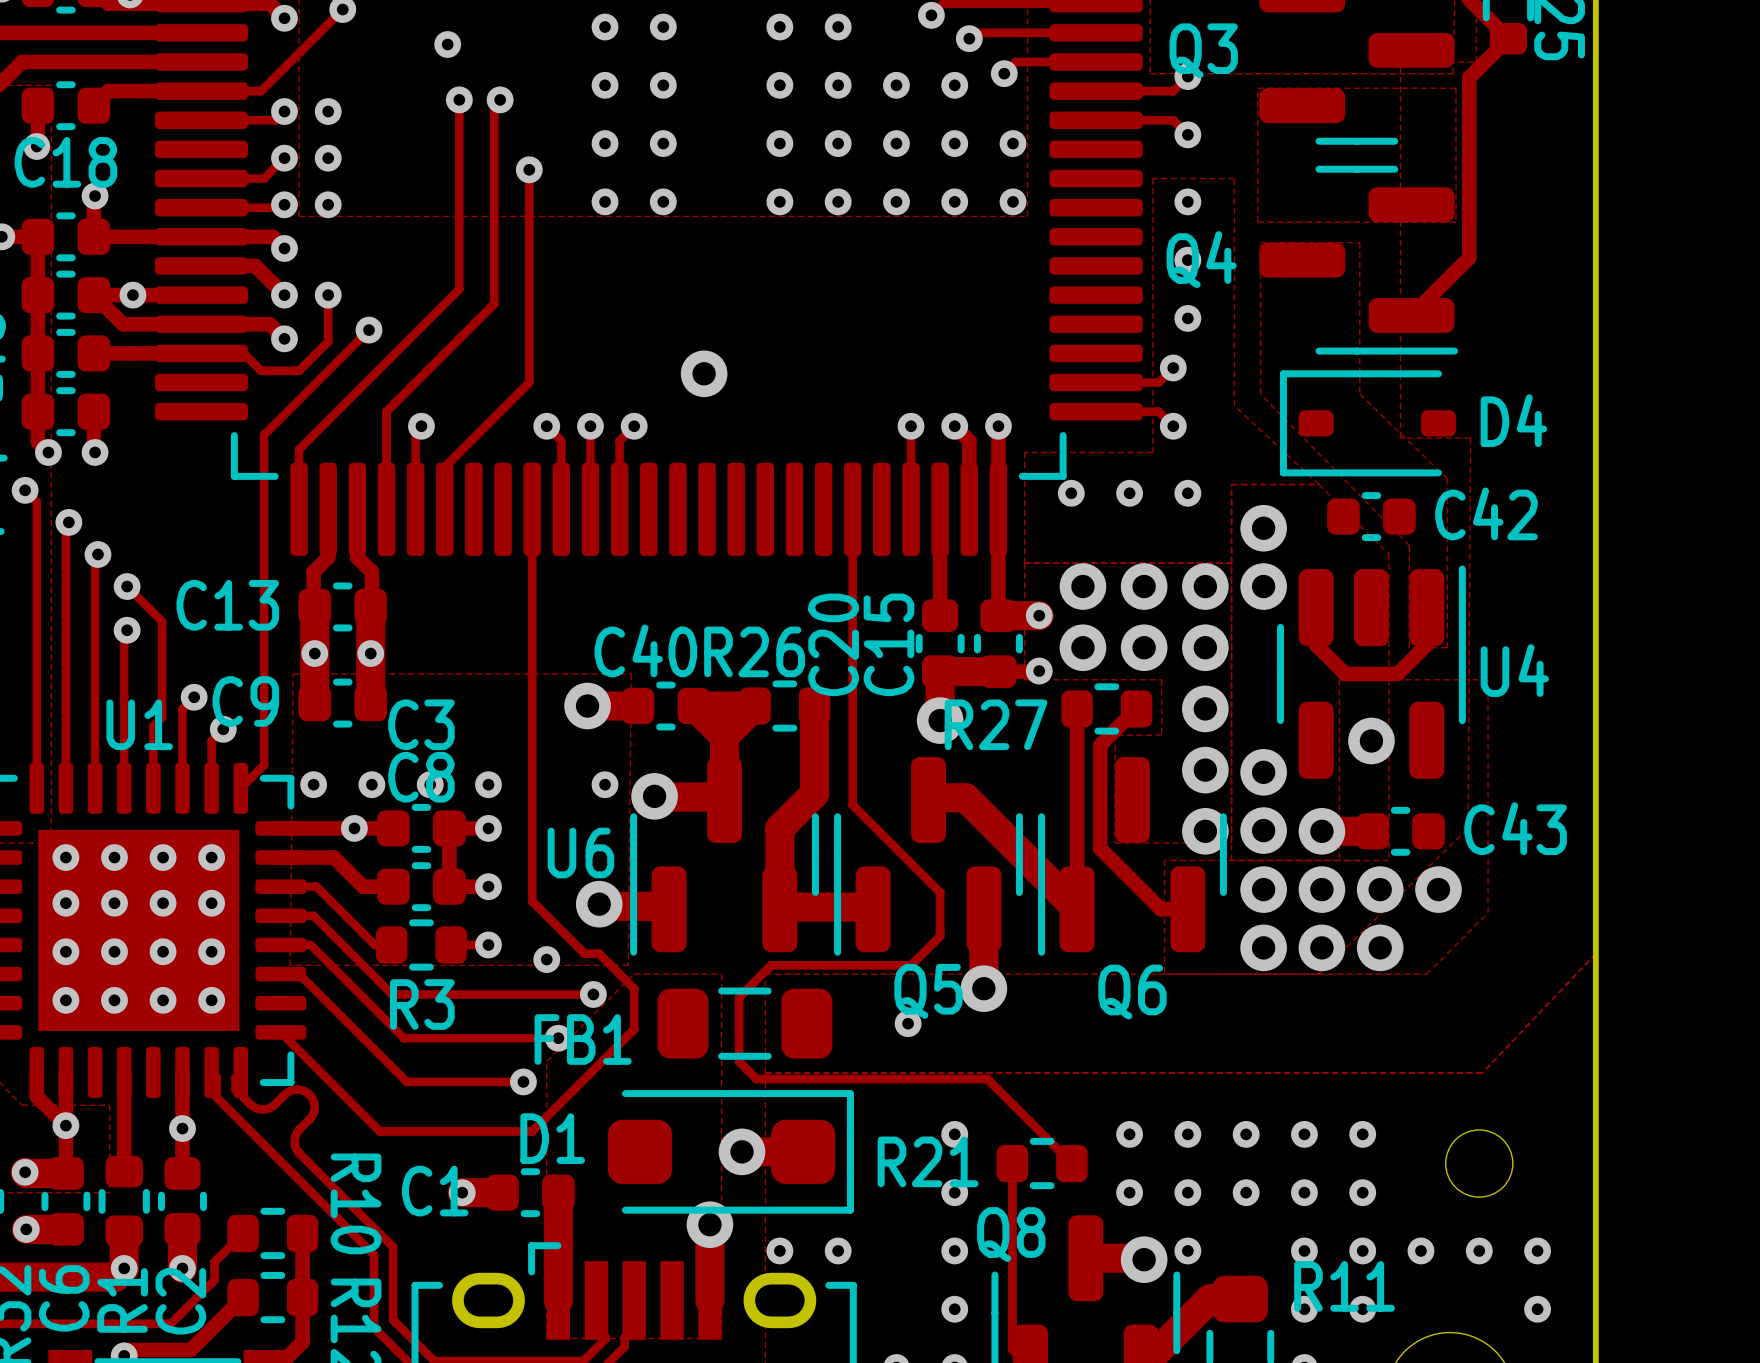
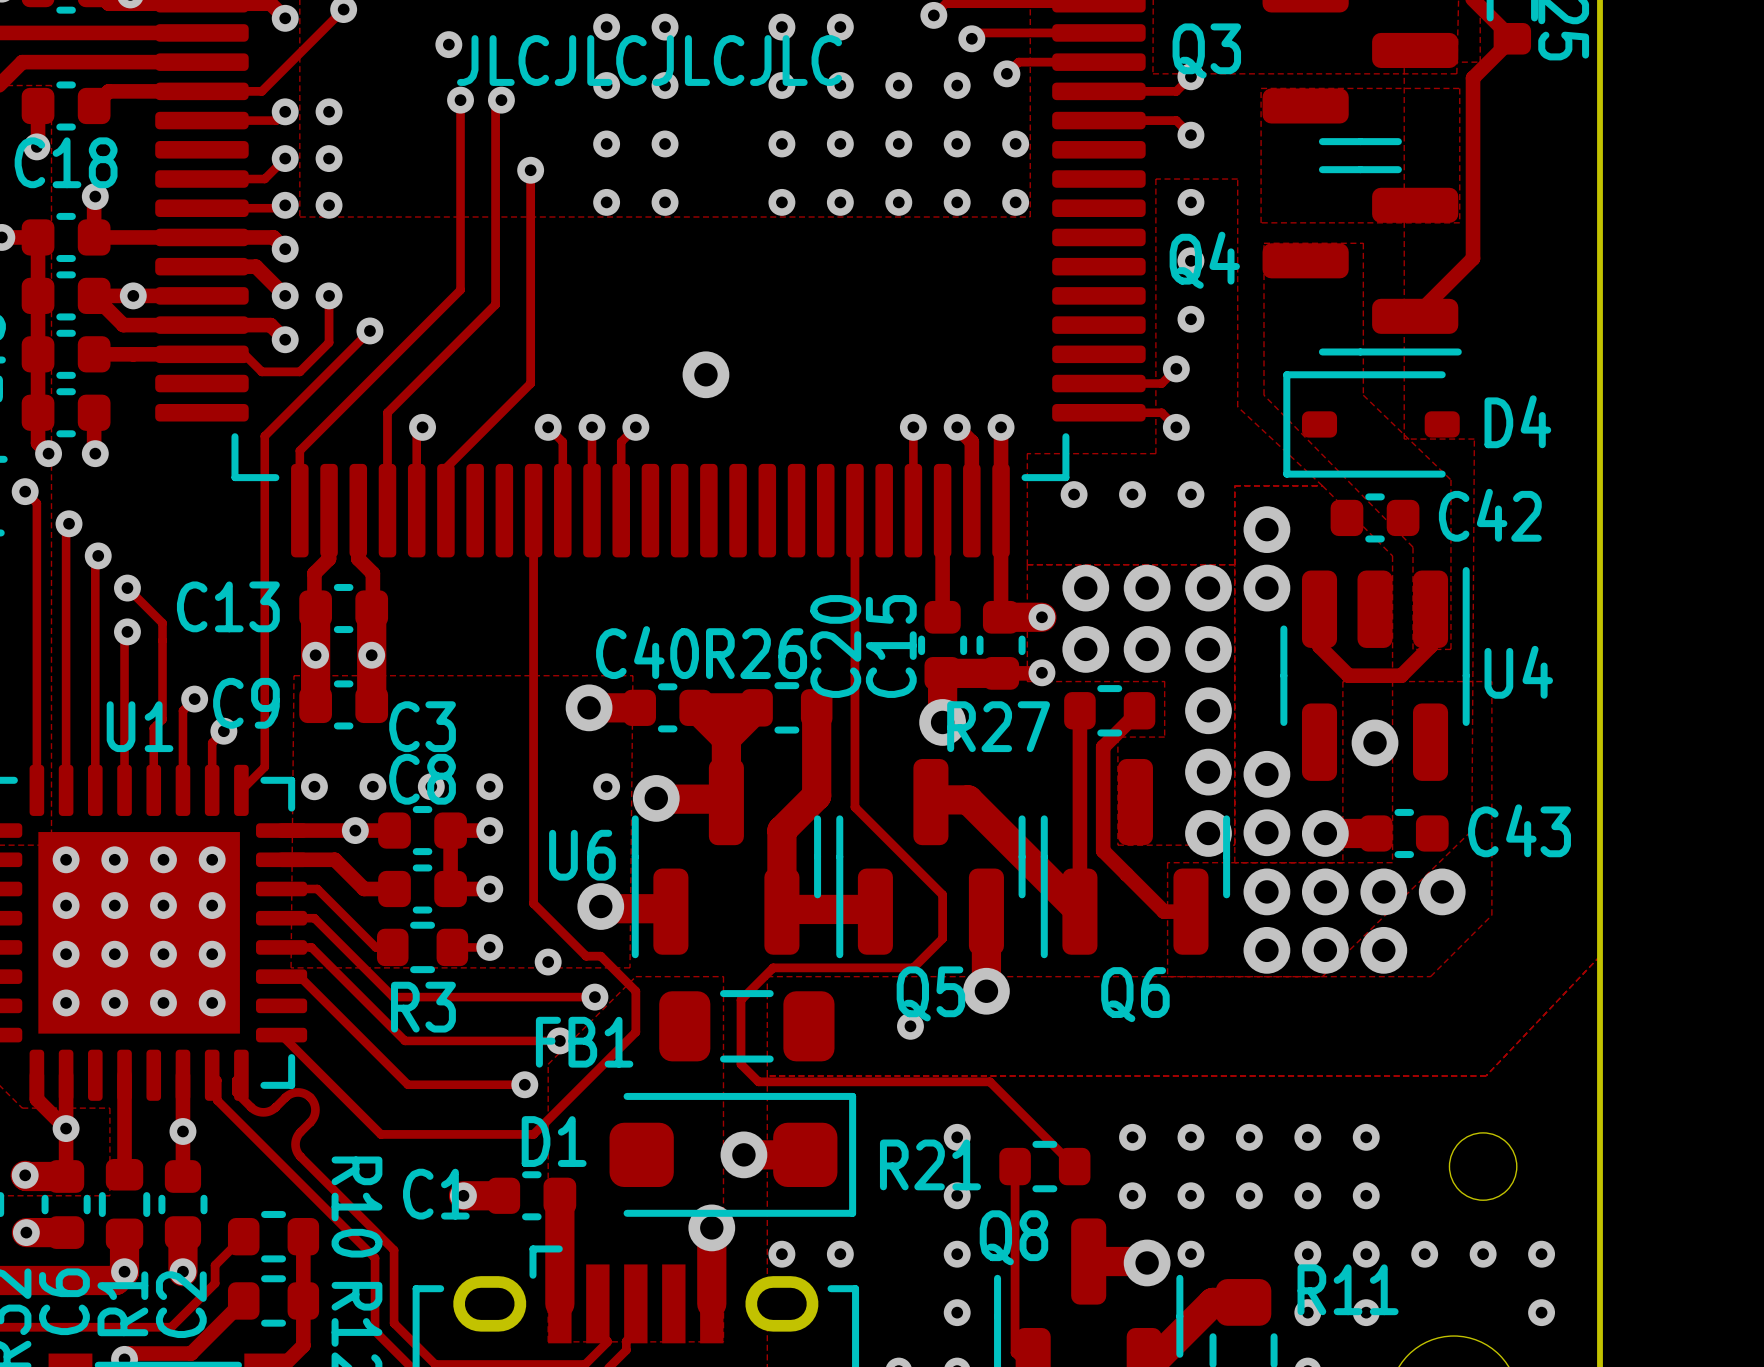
text: none -> JLCJLCJLCJLC (649, 60)

